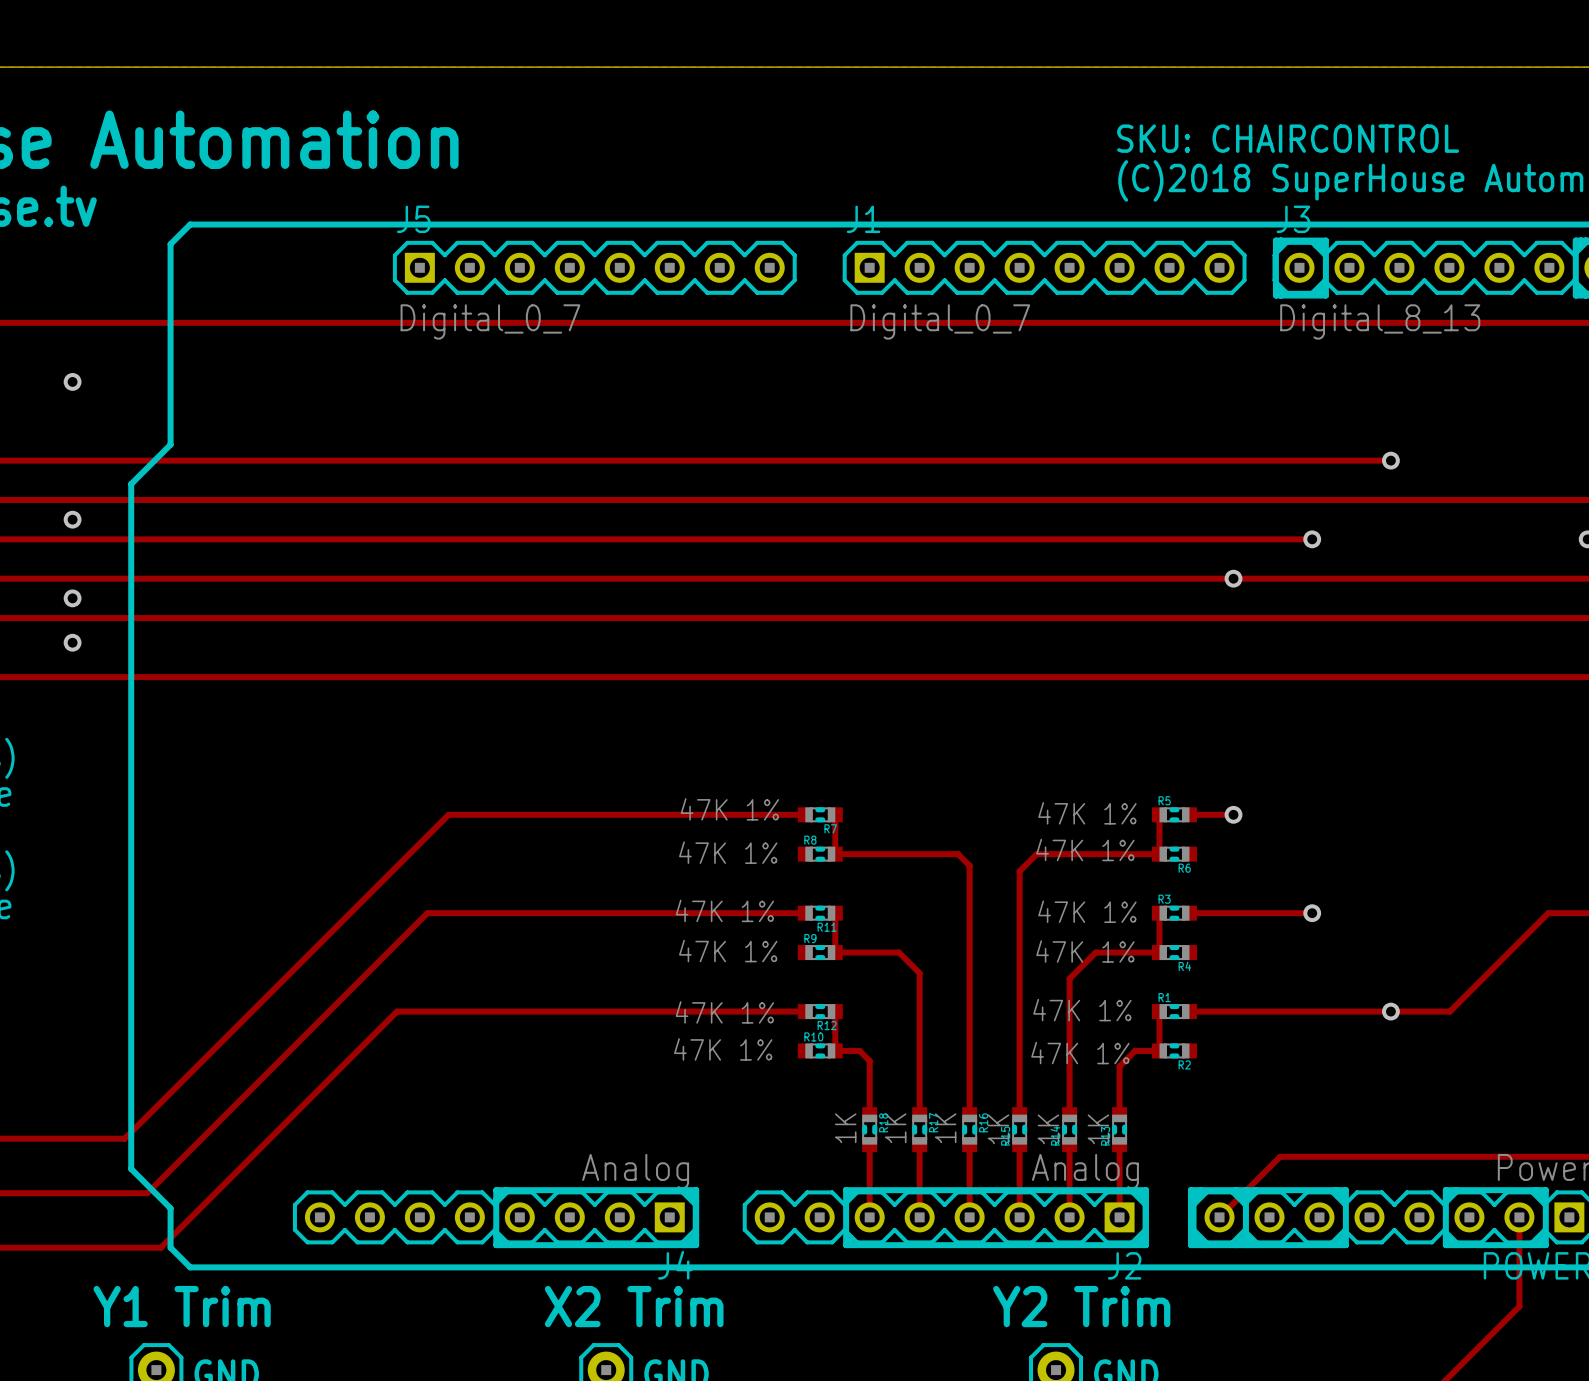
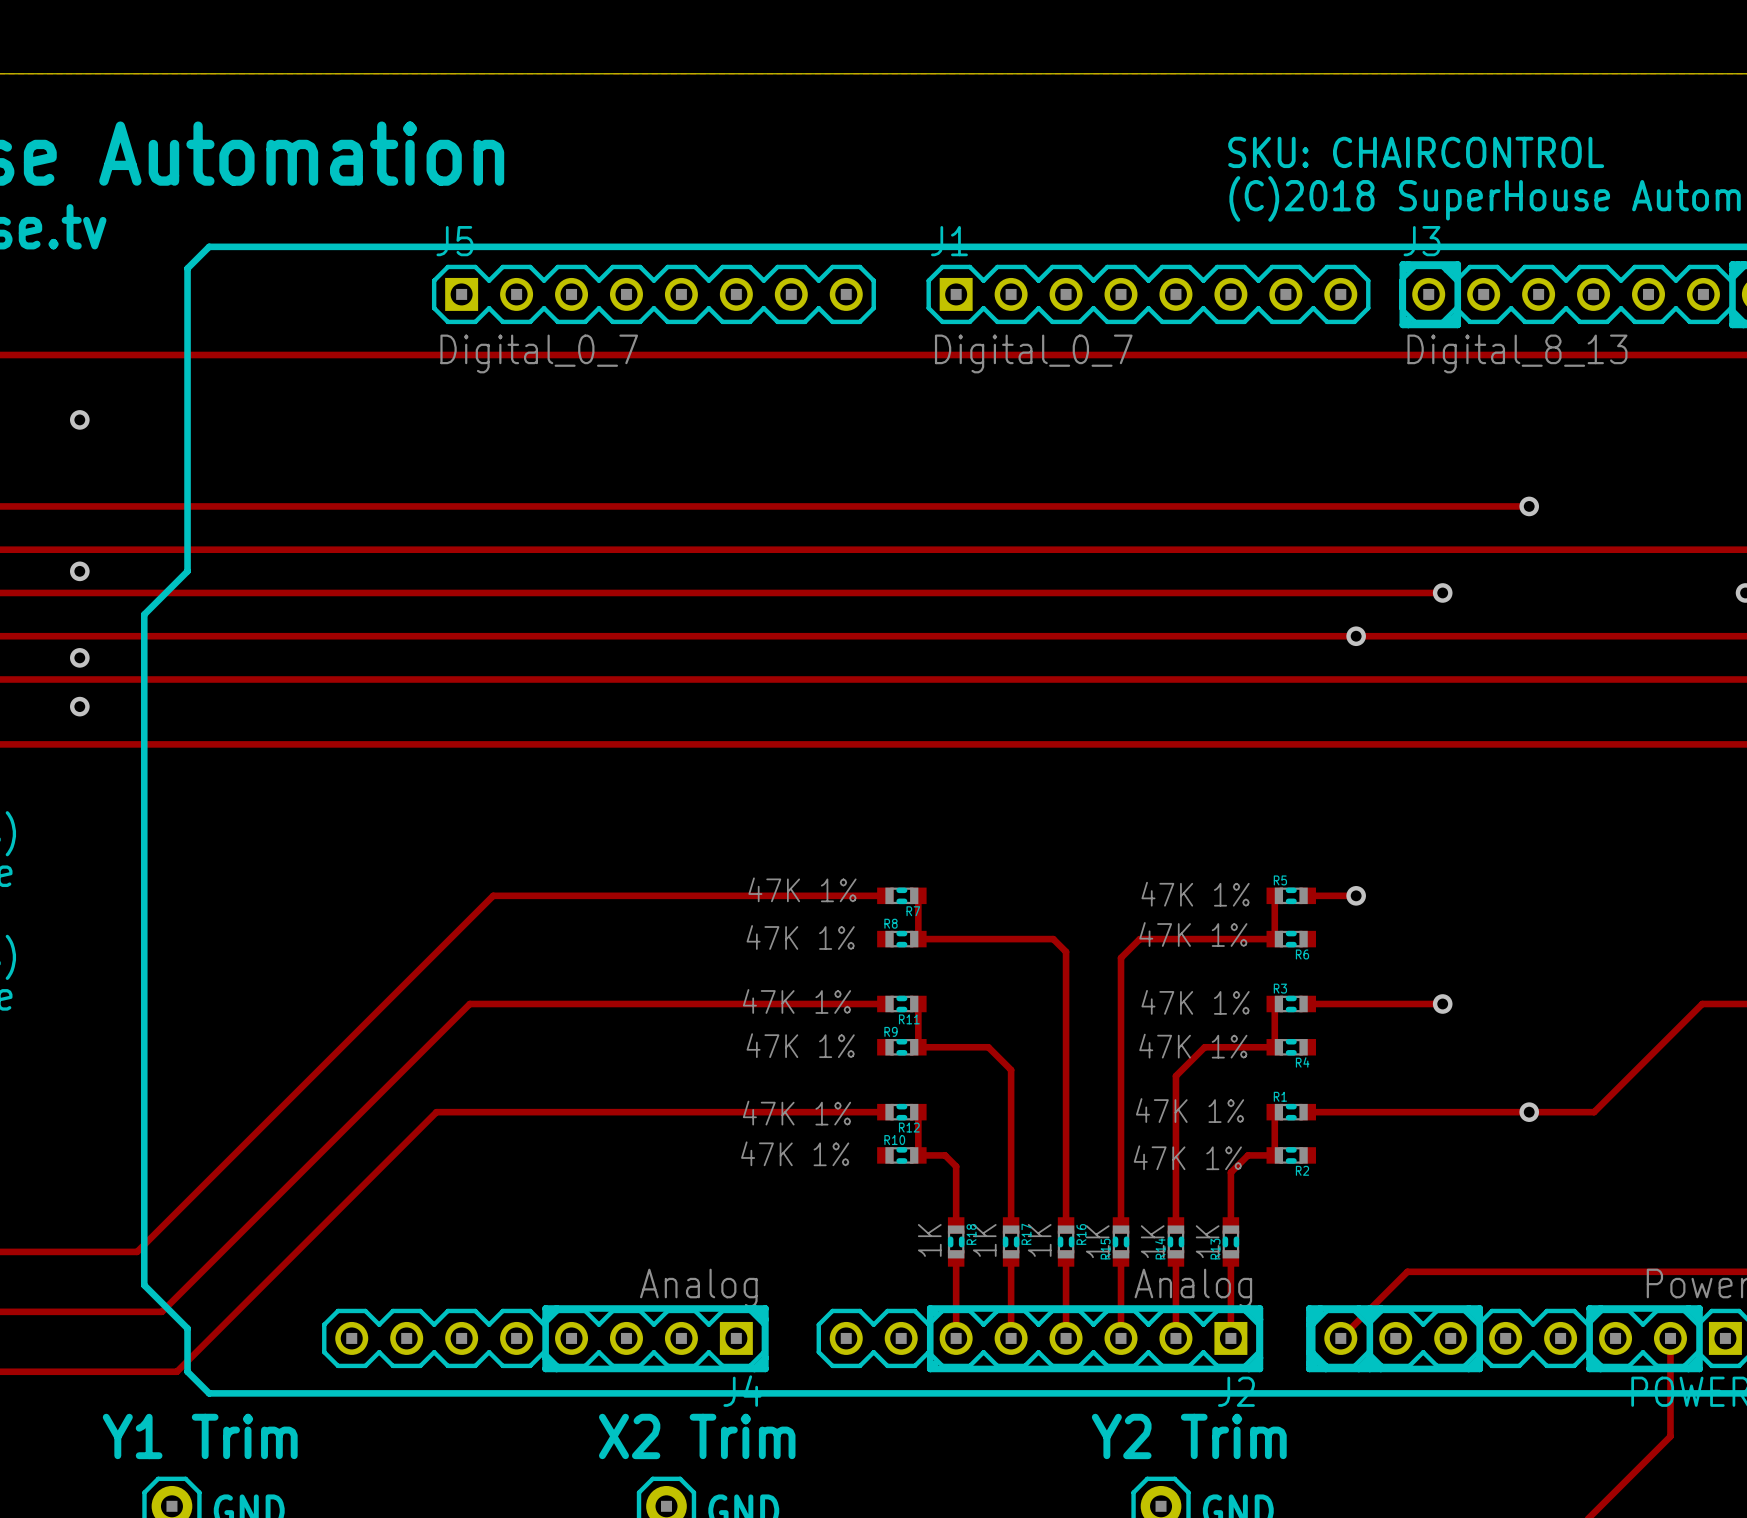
line: (170, 444) (131, 484) (131, 559) -> (187, 488) (187, 571) (144, 614)

